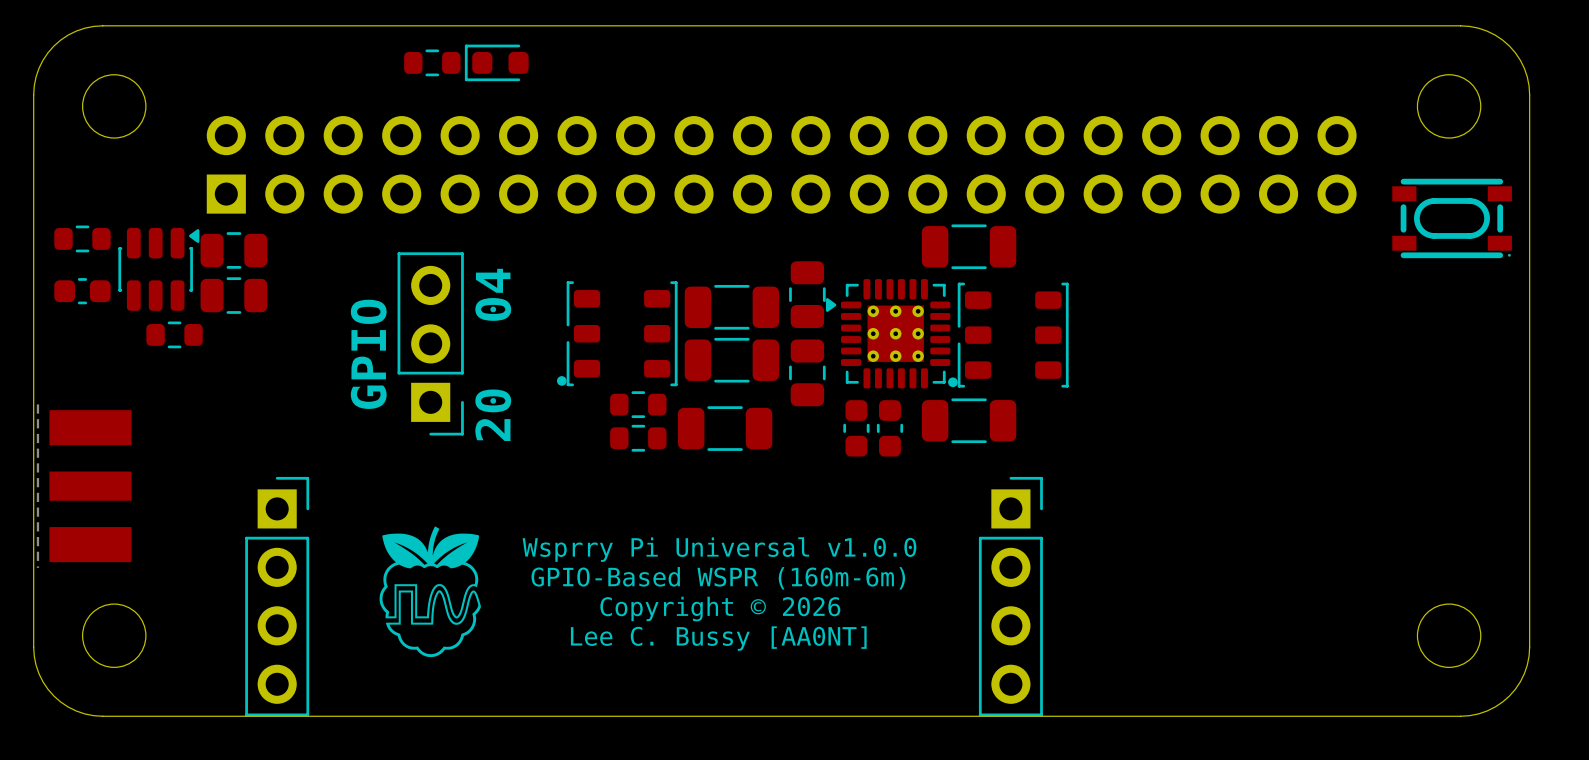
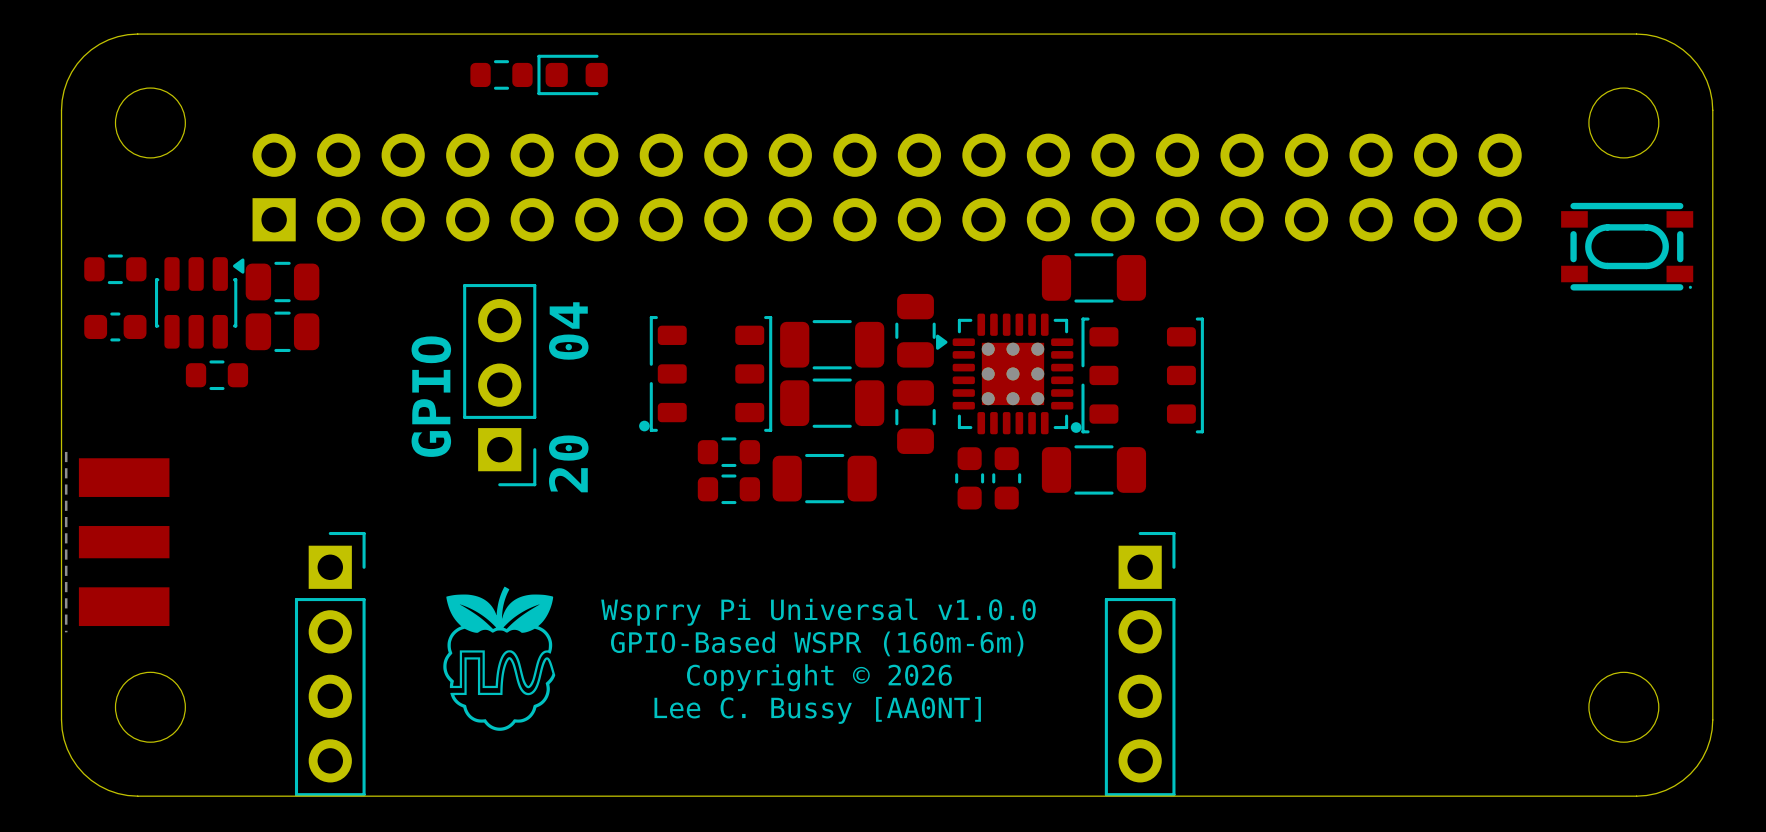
drawing: none -> [981, 342, 1045, 406]

